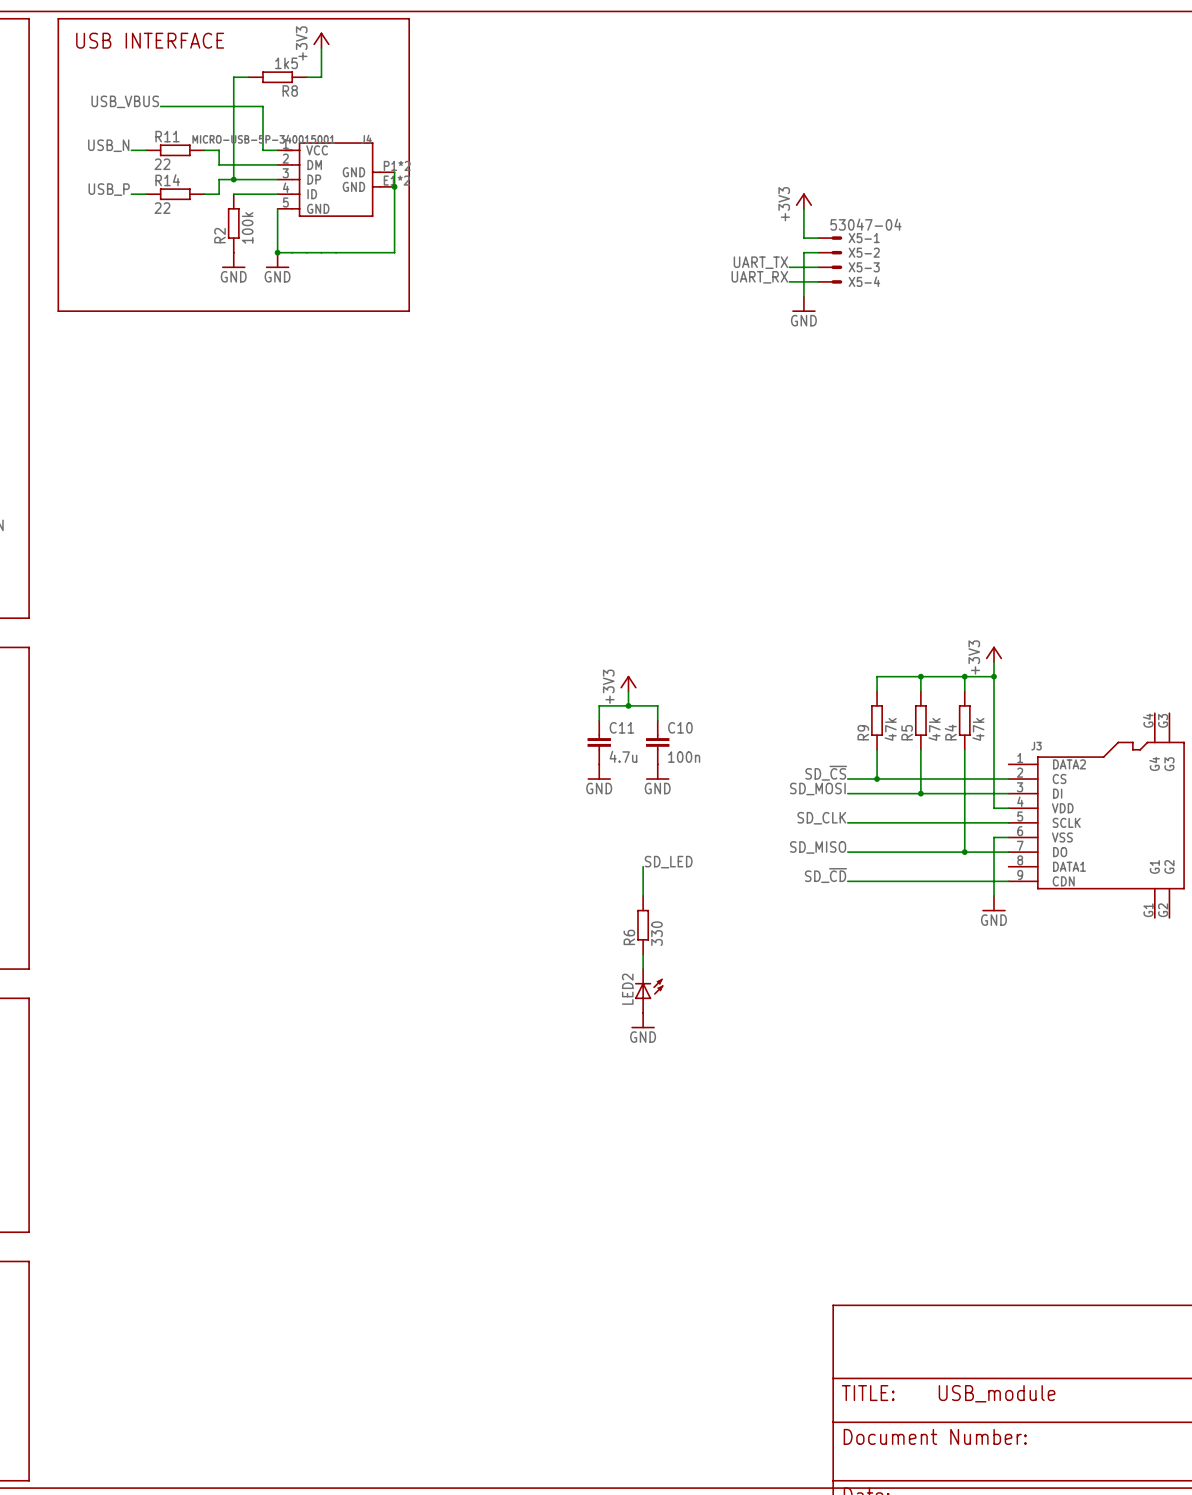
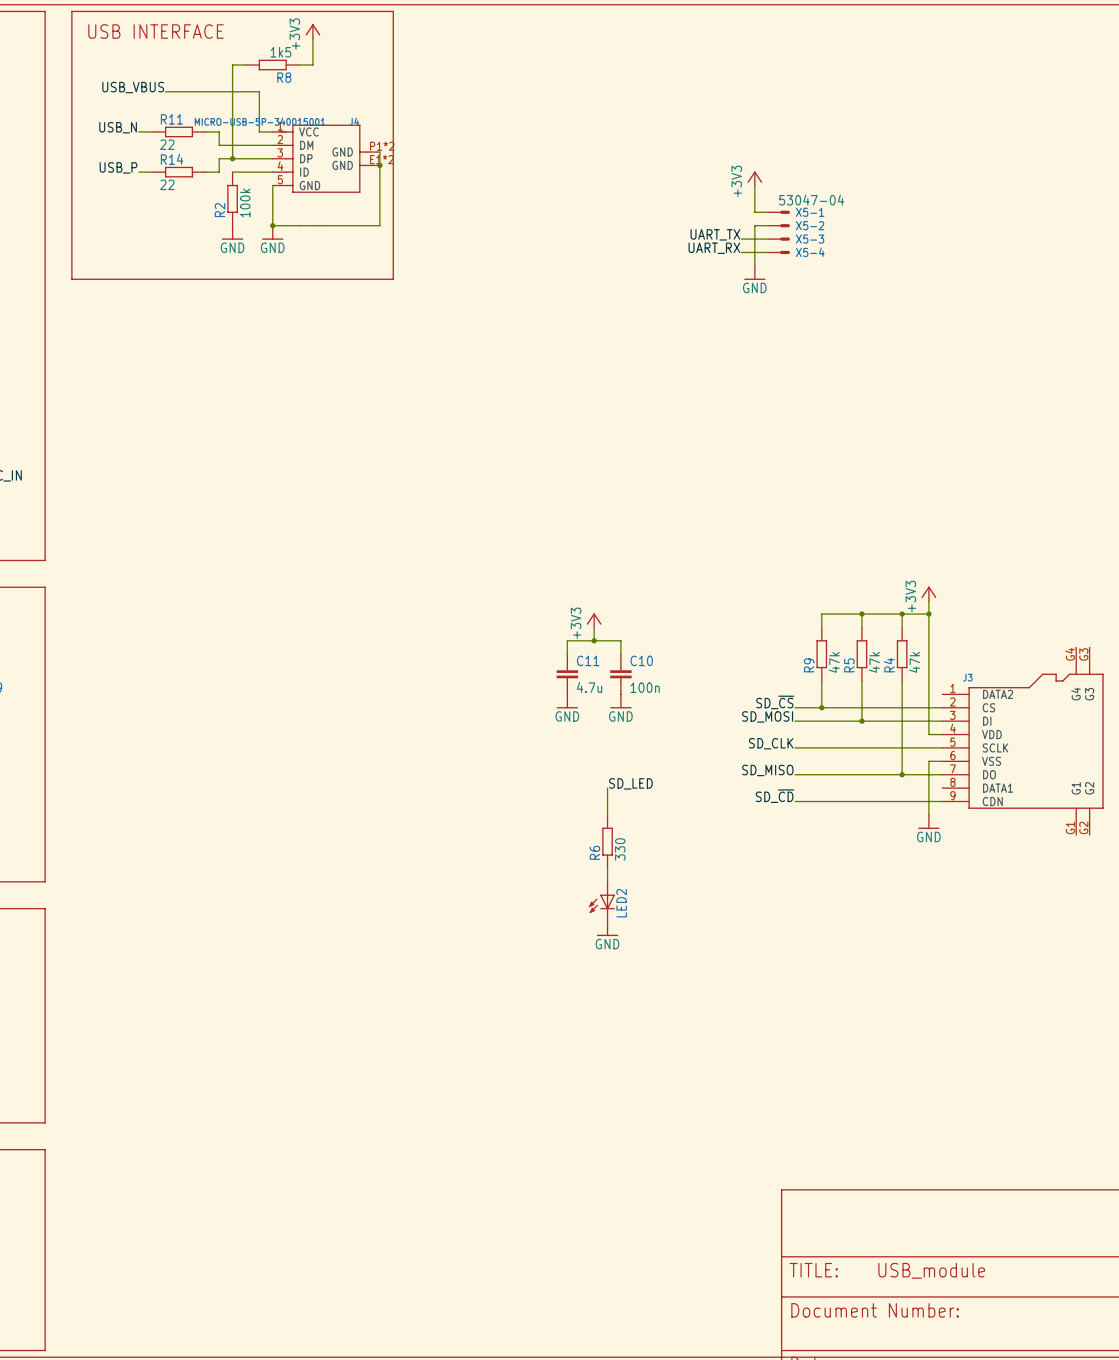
LED2 rotation: 0° (649, 988) -> 180° (601, 903)

